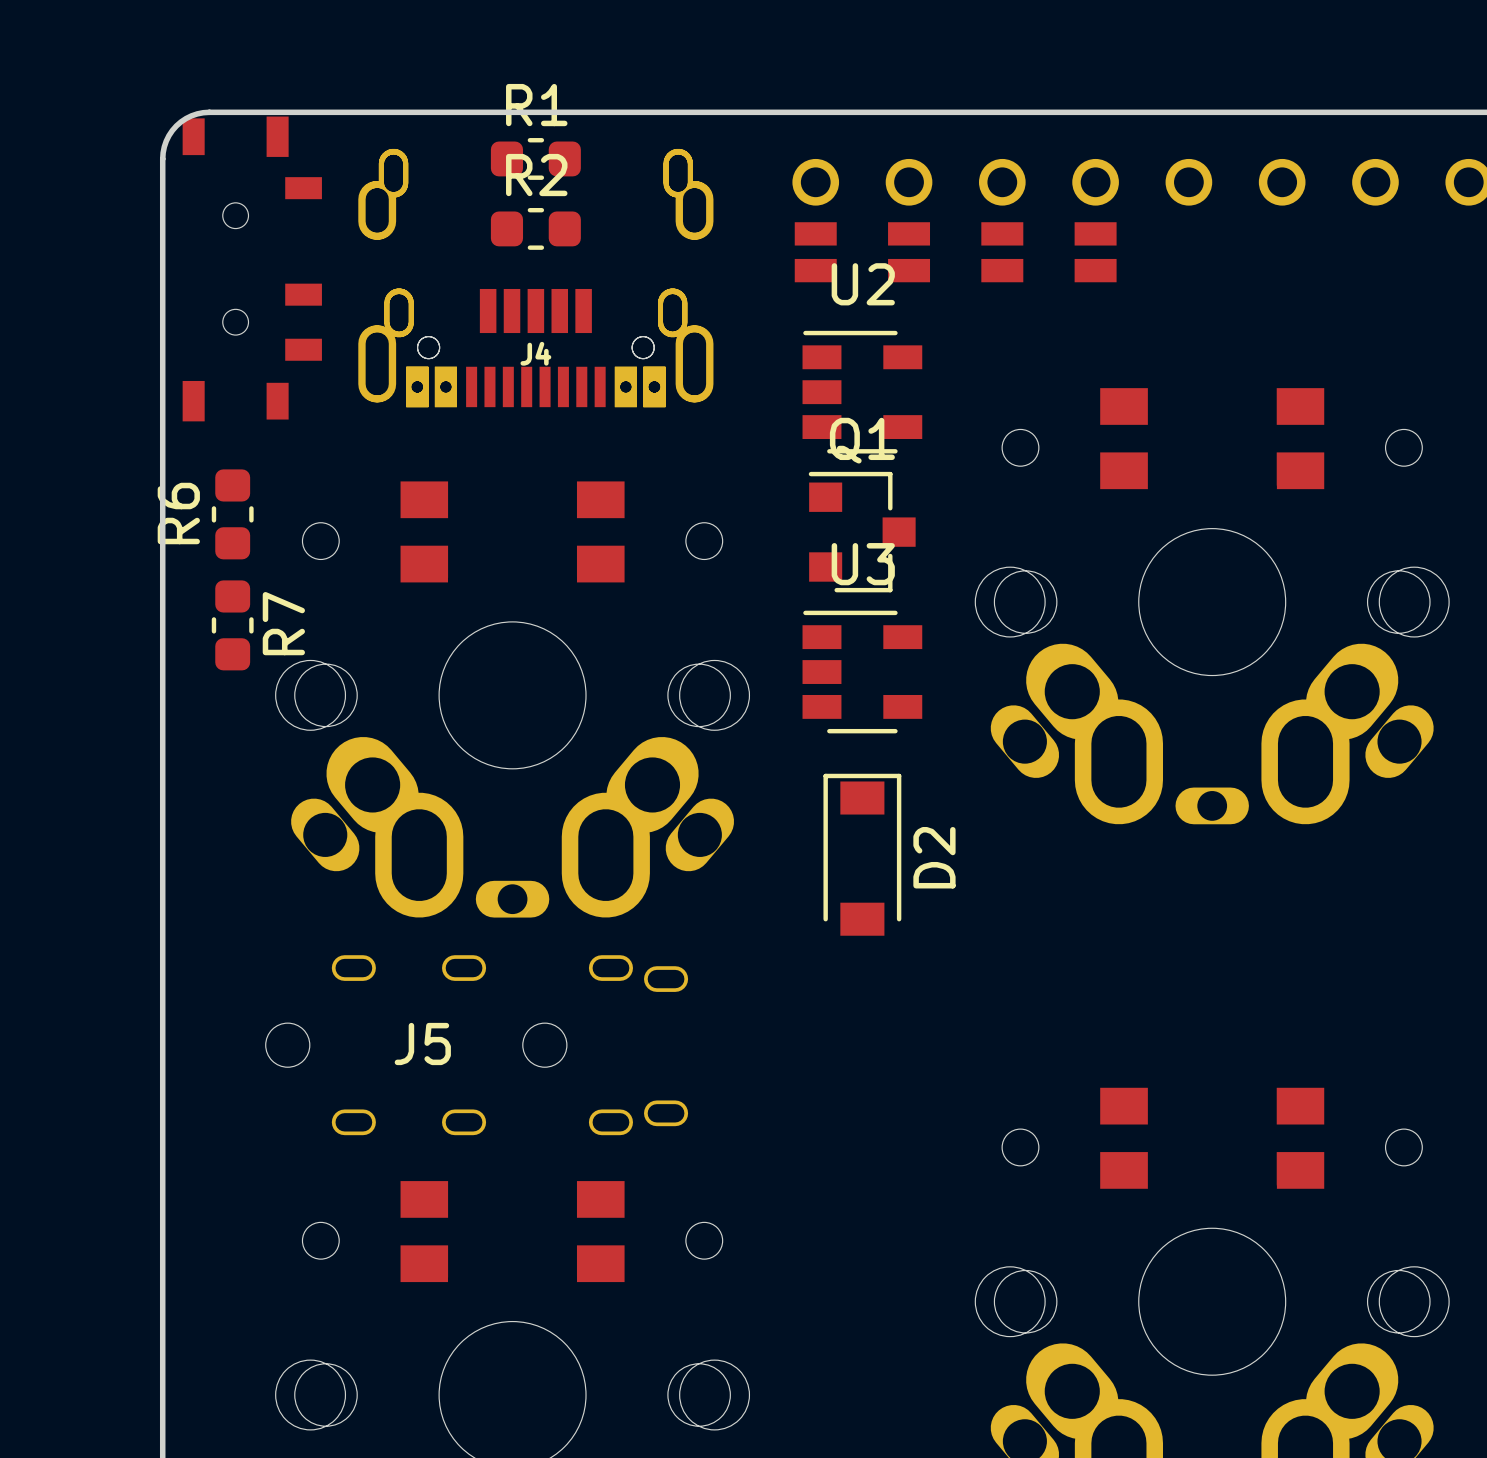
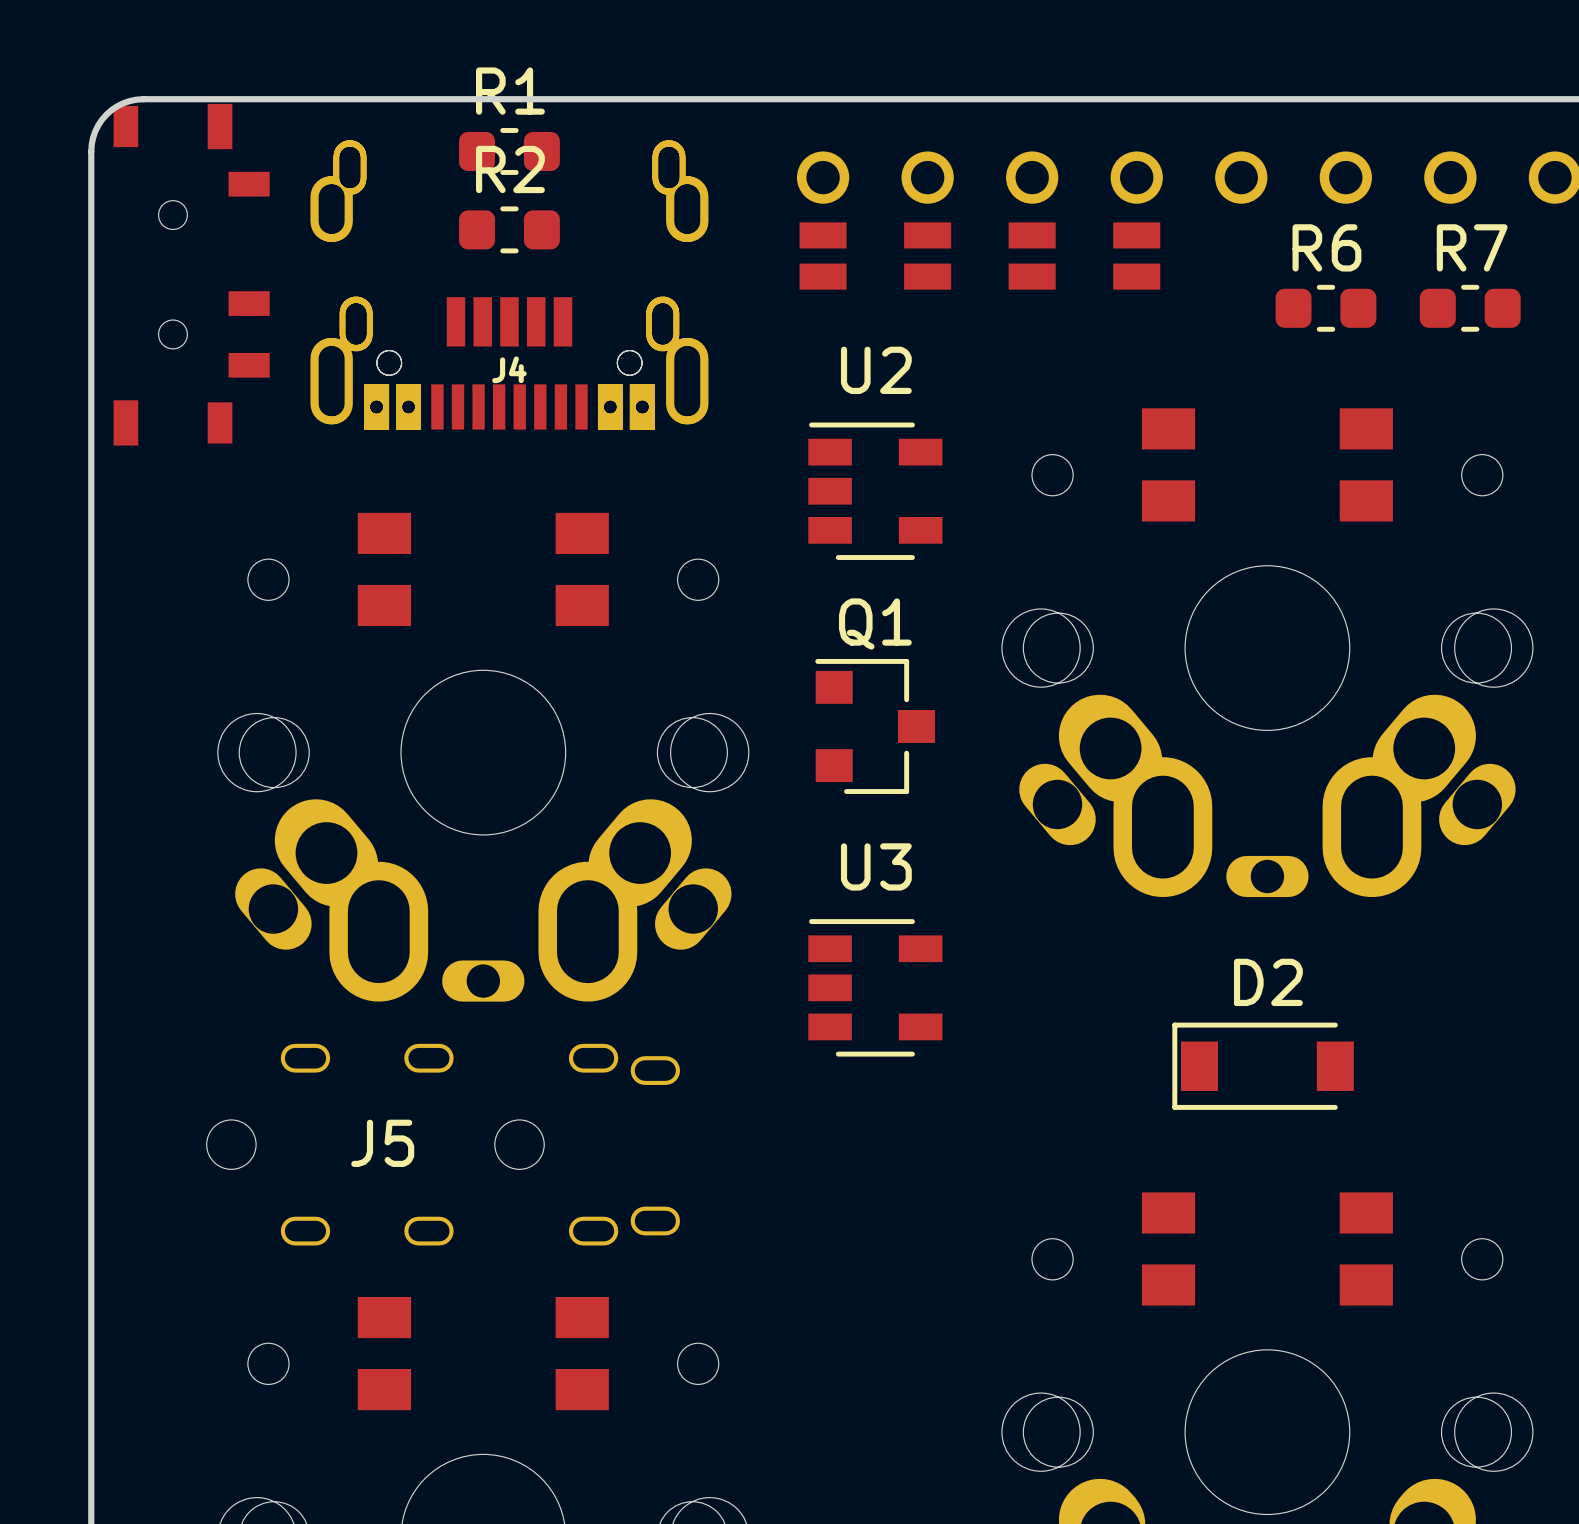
U2 position: (862, 392) -> (875, 491)
R6 rotation: 0° (232, 514) -> 90° clockwise (1325, 308)
R6 position: (232, 514) -> (1325, 308)
Q1 position: (862, 532) -> (875, 726)
R7 name position: R7 (283, 623) -> R7 (1472, 247)
R7 rotation: 0° (232, 625) -> 90° clockwise (1470, 308)
R7 position: (232, 625) -> (1470, 308)
U3 position: (862, 672) -> (875, 987)
D2 rotation: 0° (862, 854) -> 90° counterclockwise (1263, 1066)
D2 position: (862, 854) -> (1263, 1066)

